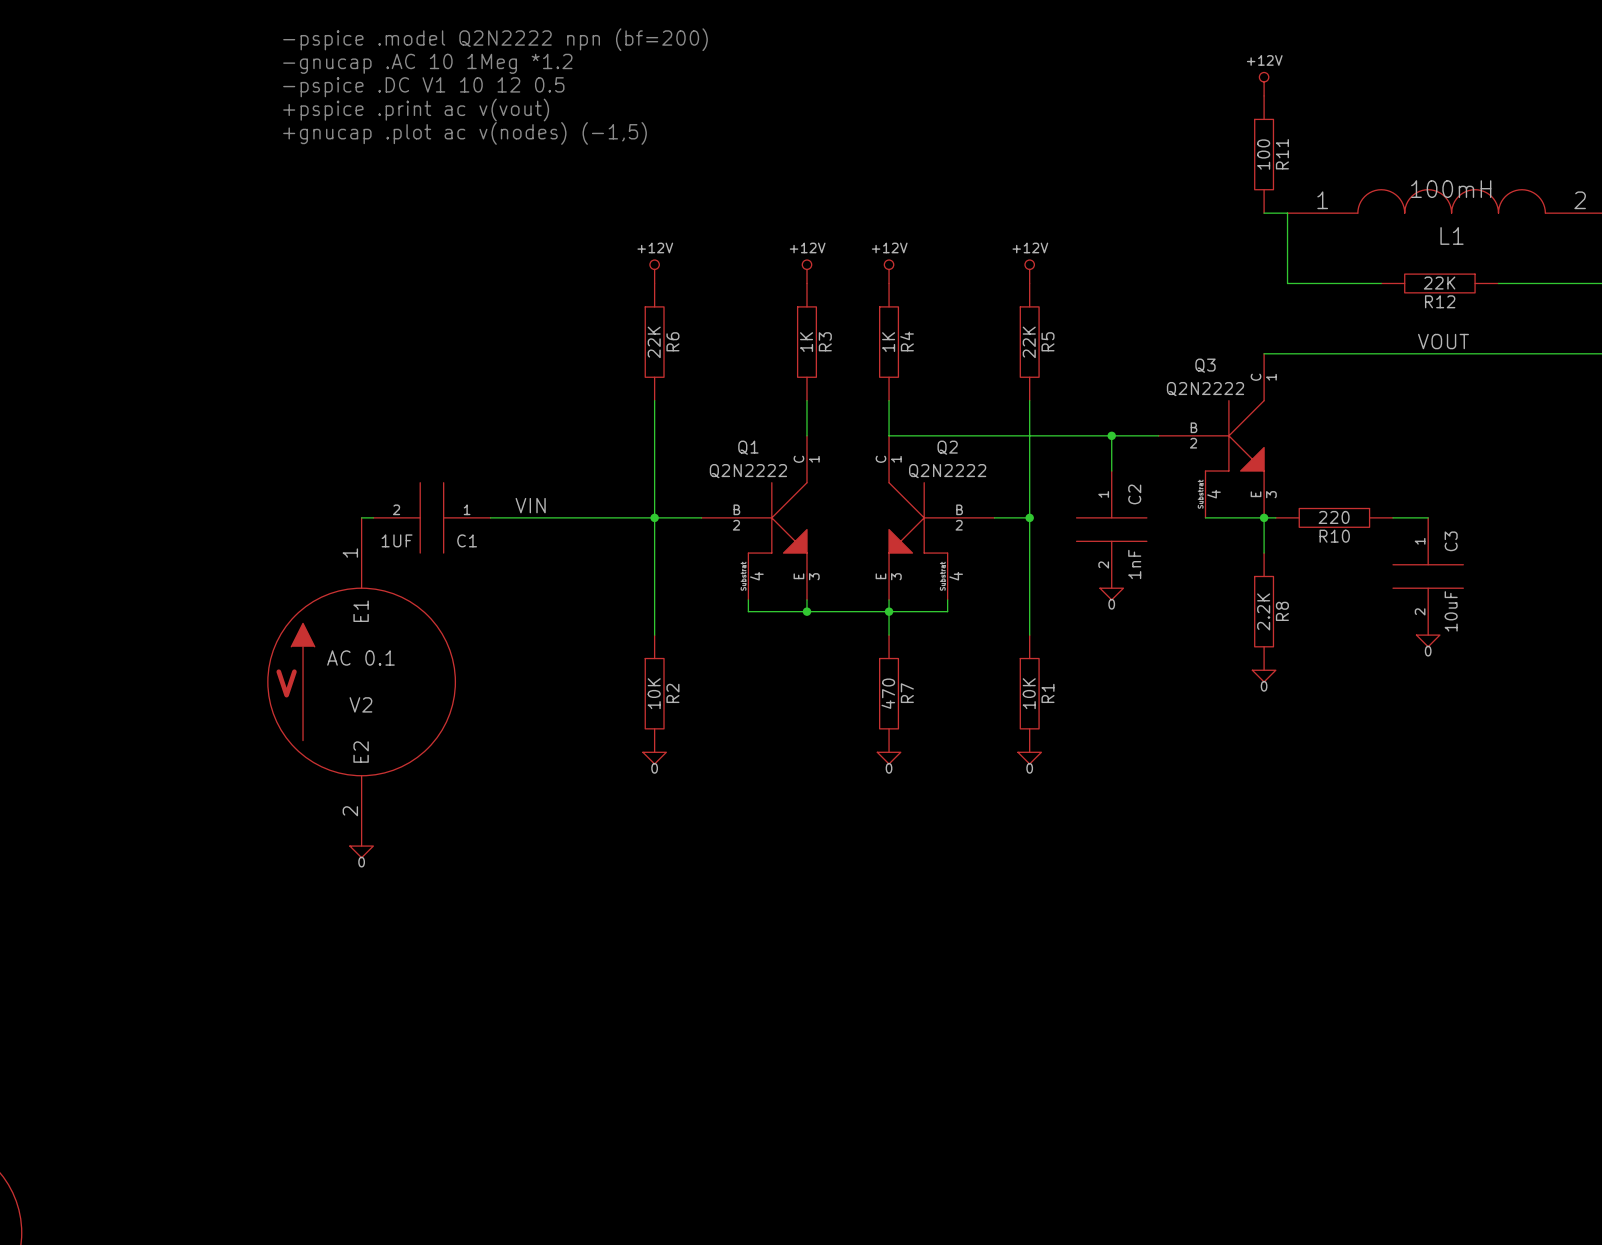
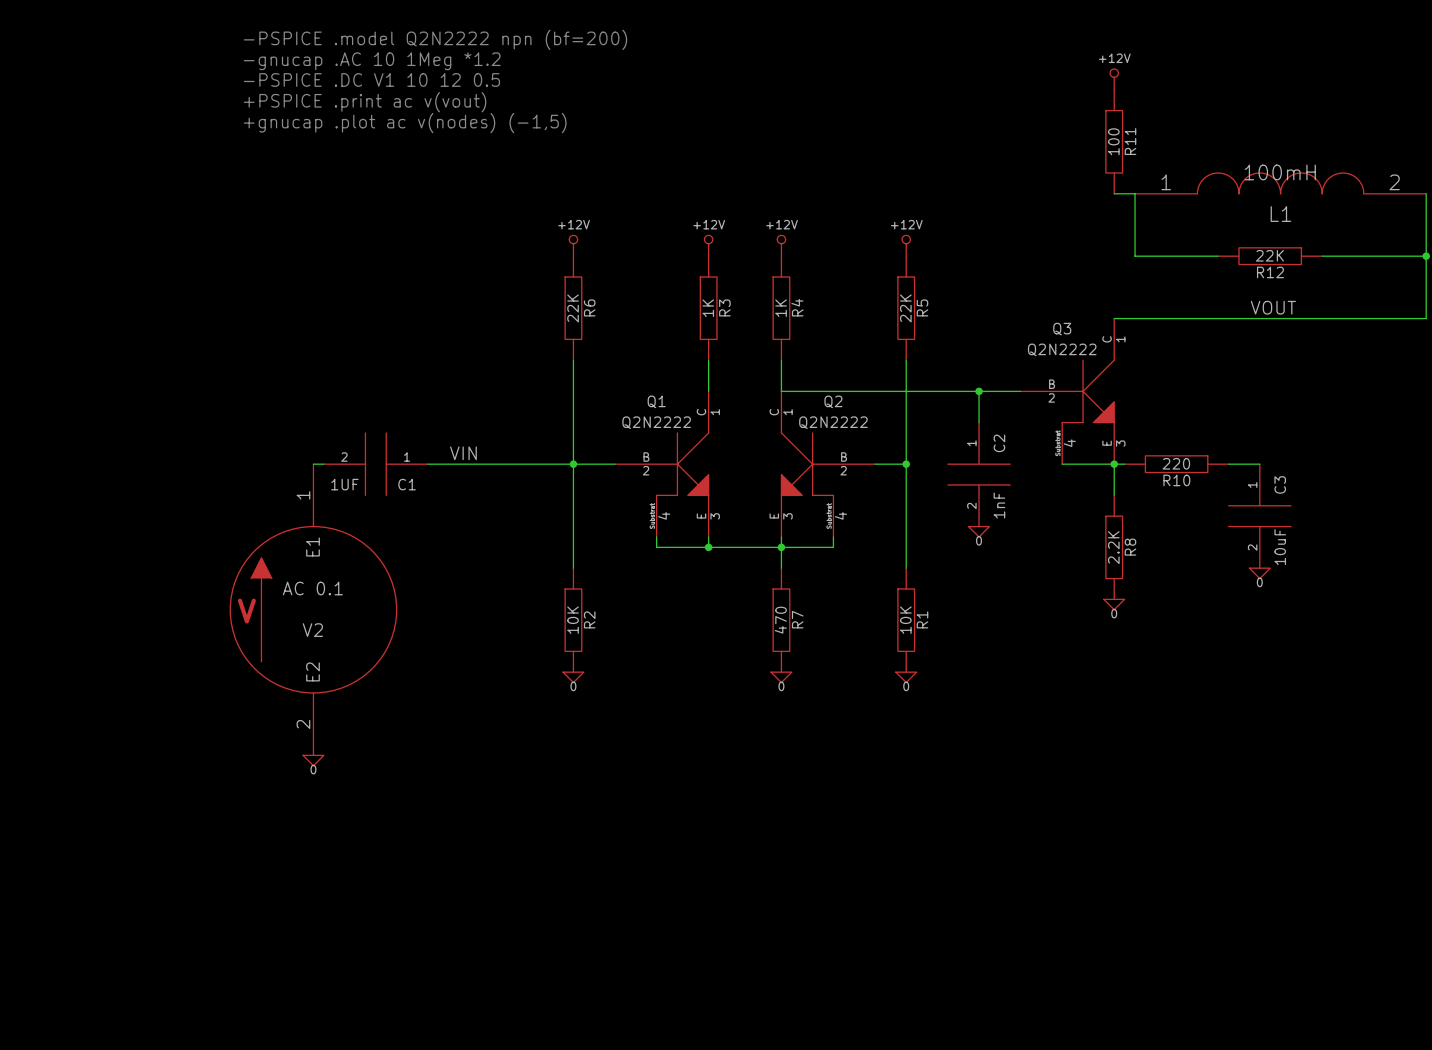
text: -pspice .model Q2N2222 npn (bf=200) (495, 39) -> -PSPICE .model Q2N2222 npn (bf=200) (435, 39)
text: -pspice .DC V1 10 12 0.5 (423, 87) -> -PSPICE .DC V1 10 12 0.5 (371, 79)
text: +pspice .print ac v(vout) (416, 110) -> +PSPICE .print ac v(vout) (365, 102)

